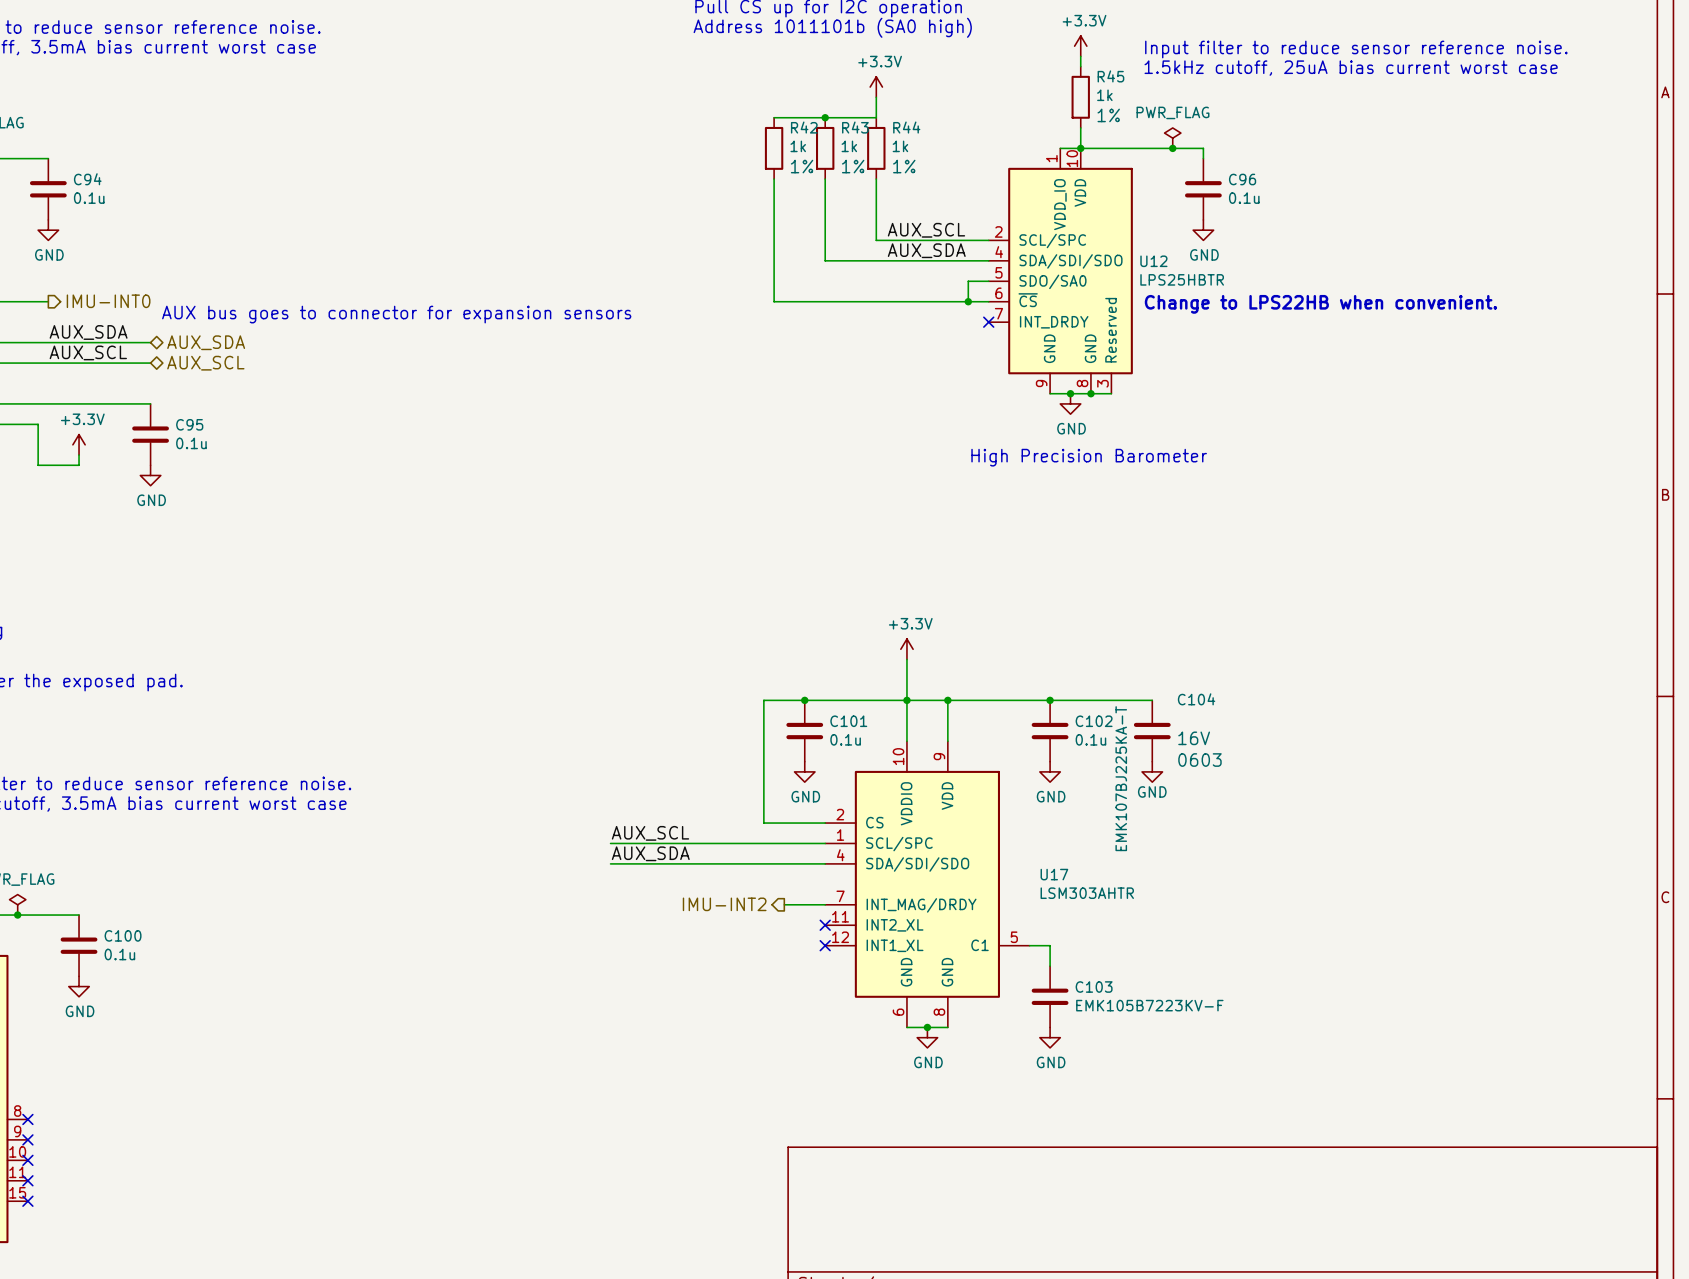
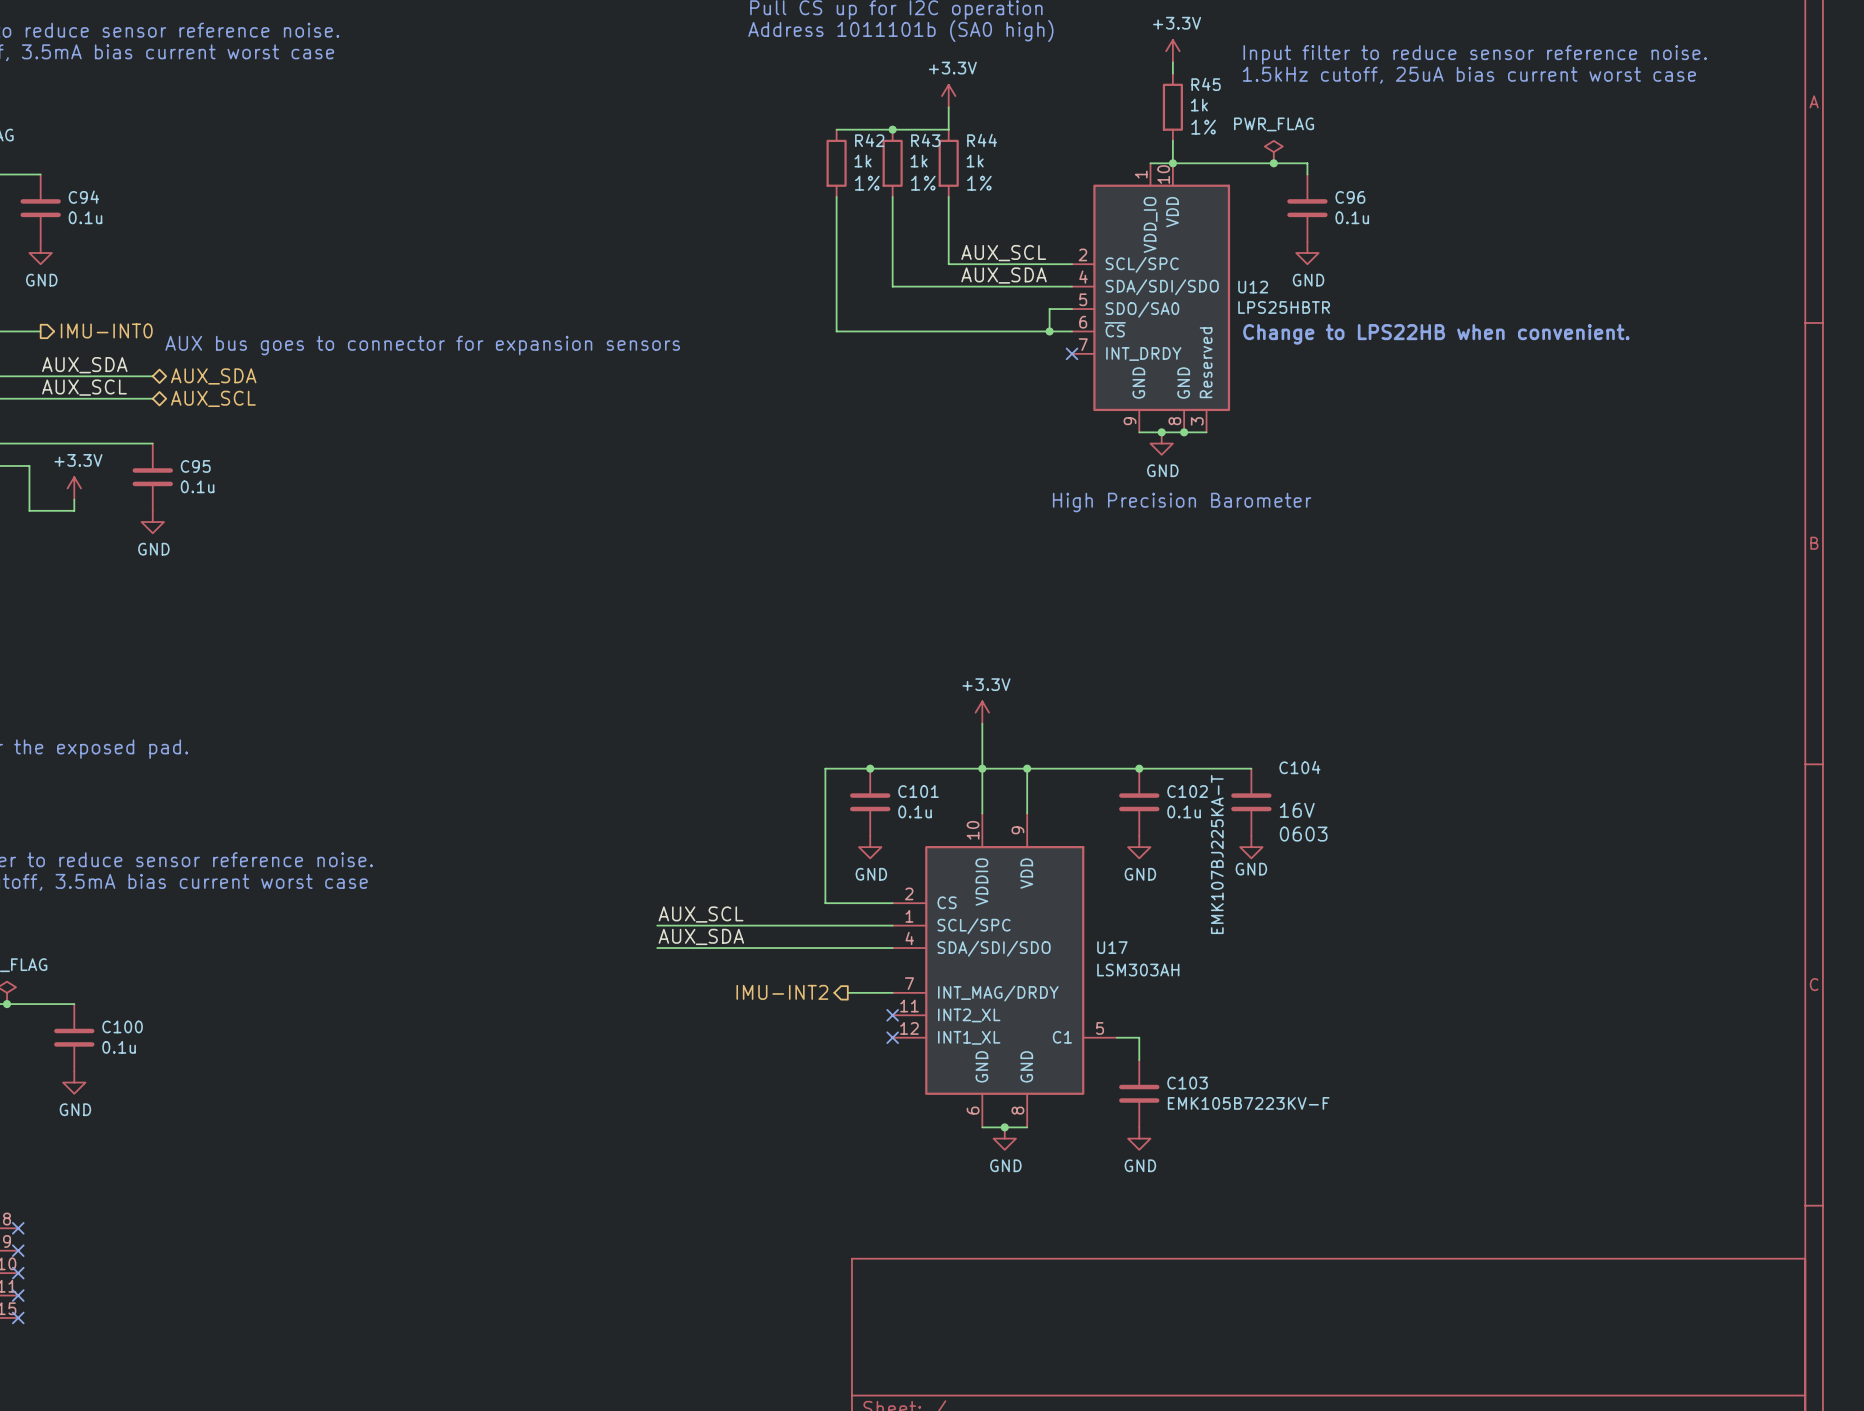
U17 name position: U17 (1054, 874) -> U17 (1112, 947)
U17 value: LSM303AHTR (1087, 893) -> LSM303AH (1138, 970)

